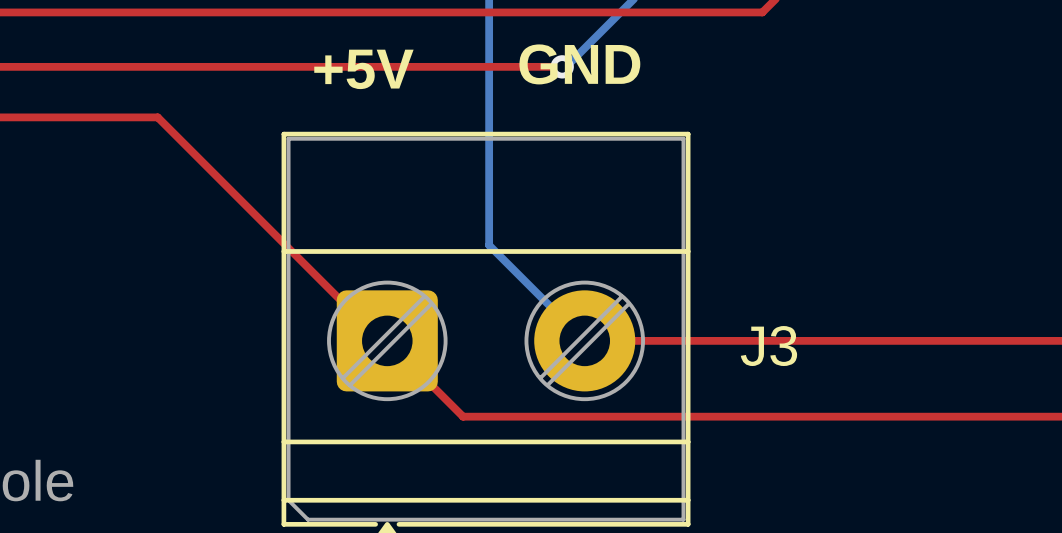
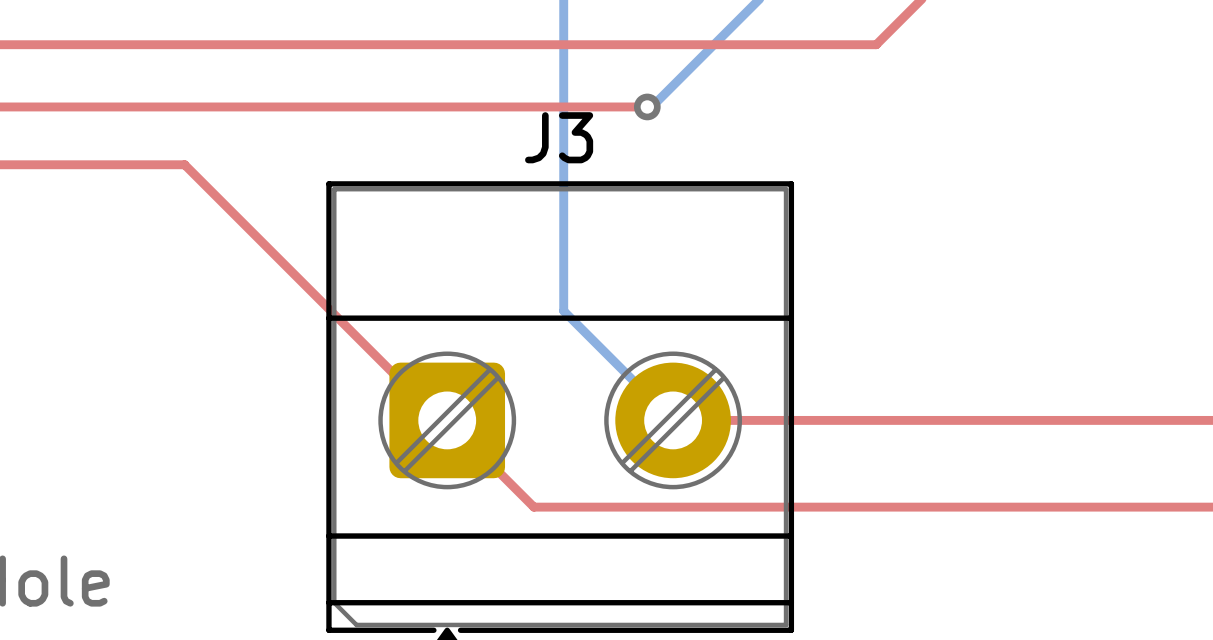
text: GND (579, 64) -> none
text: +5V (363, 69) -> none
J3 name position: J3 (768, 346) -> J3 (559, 137)

